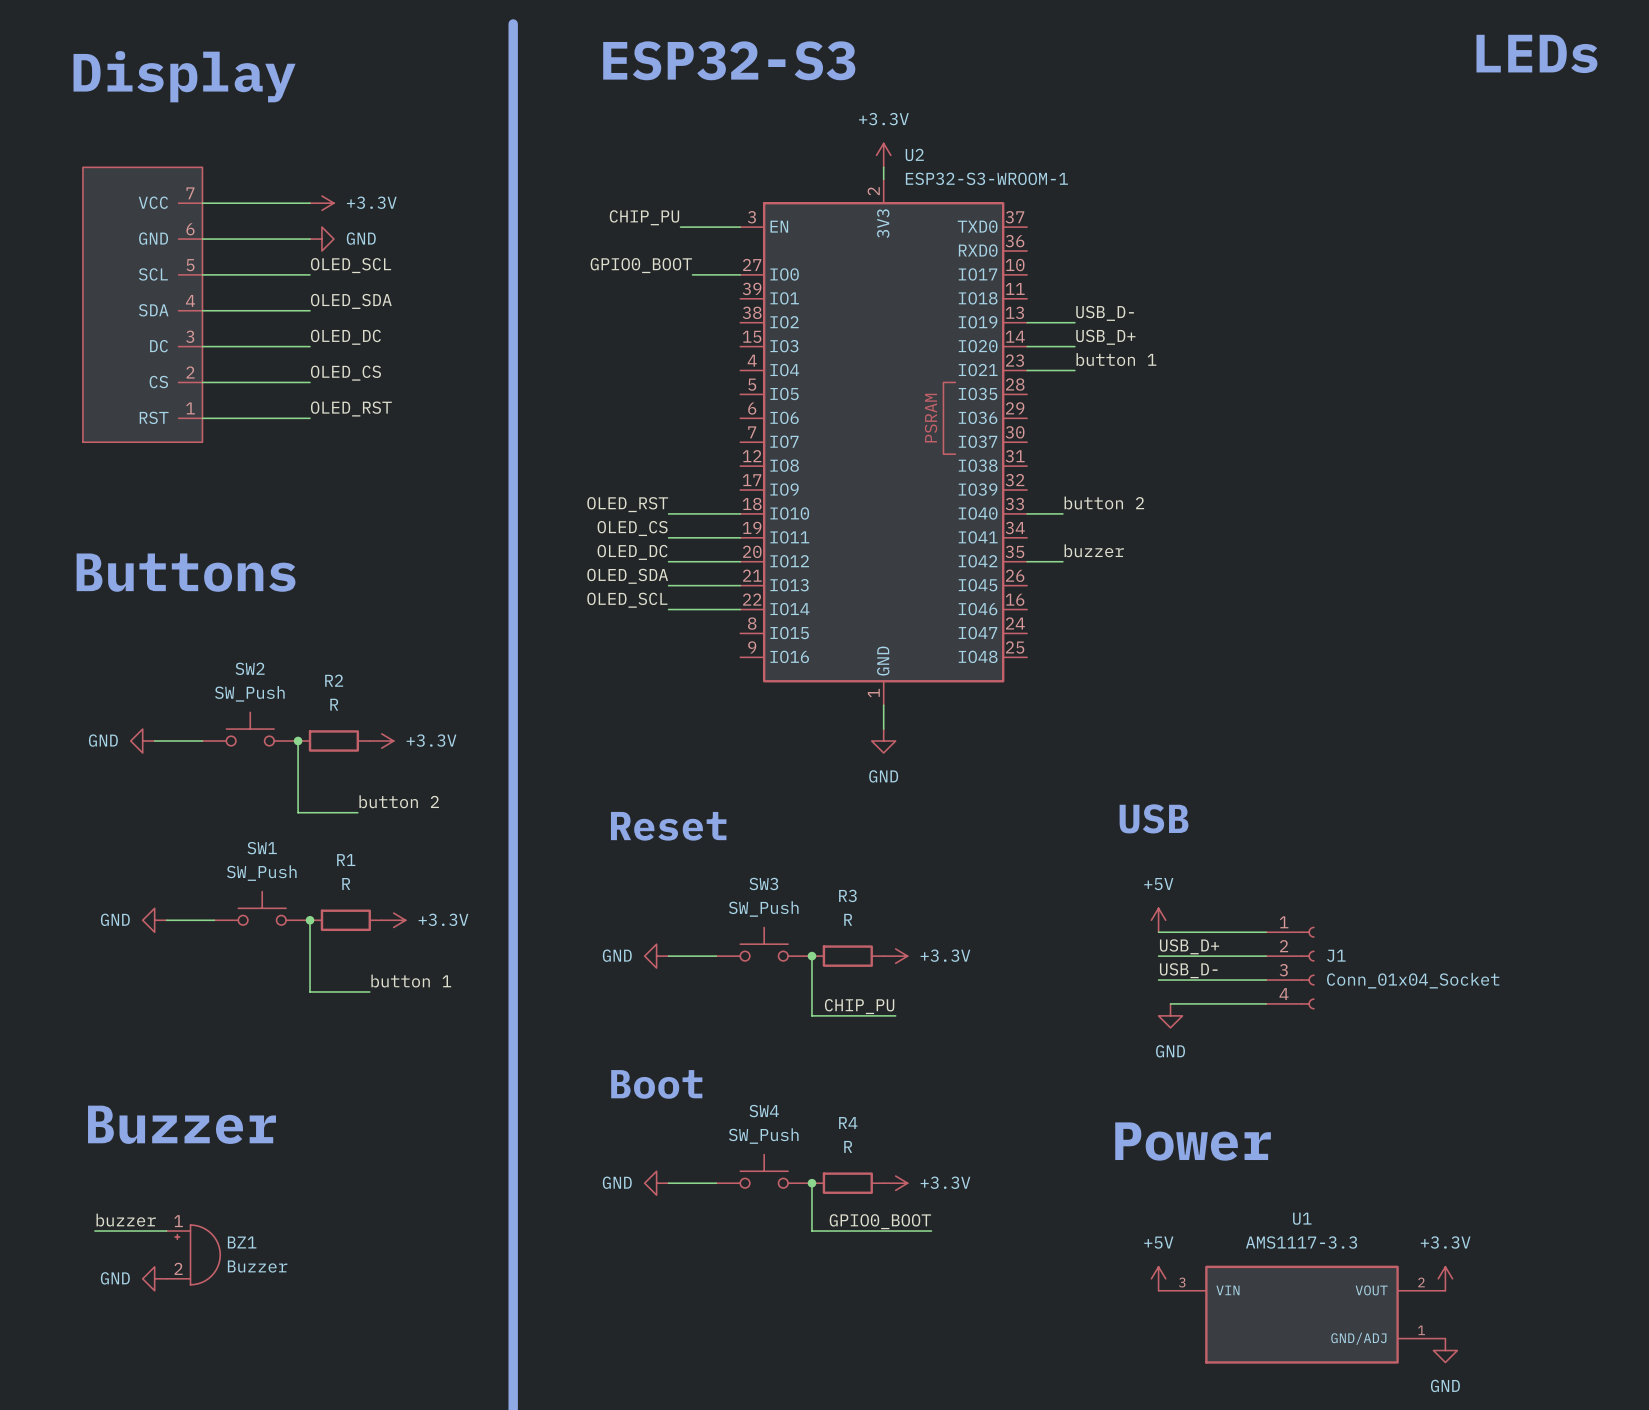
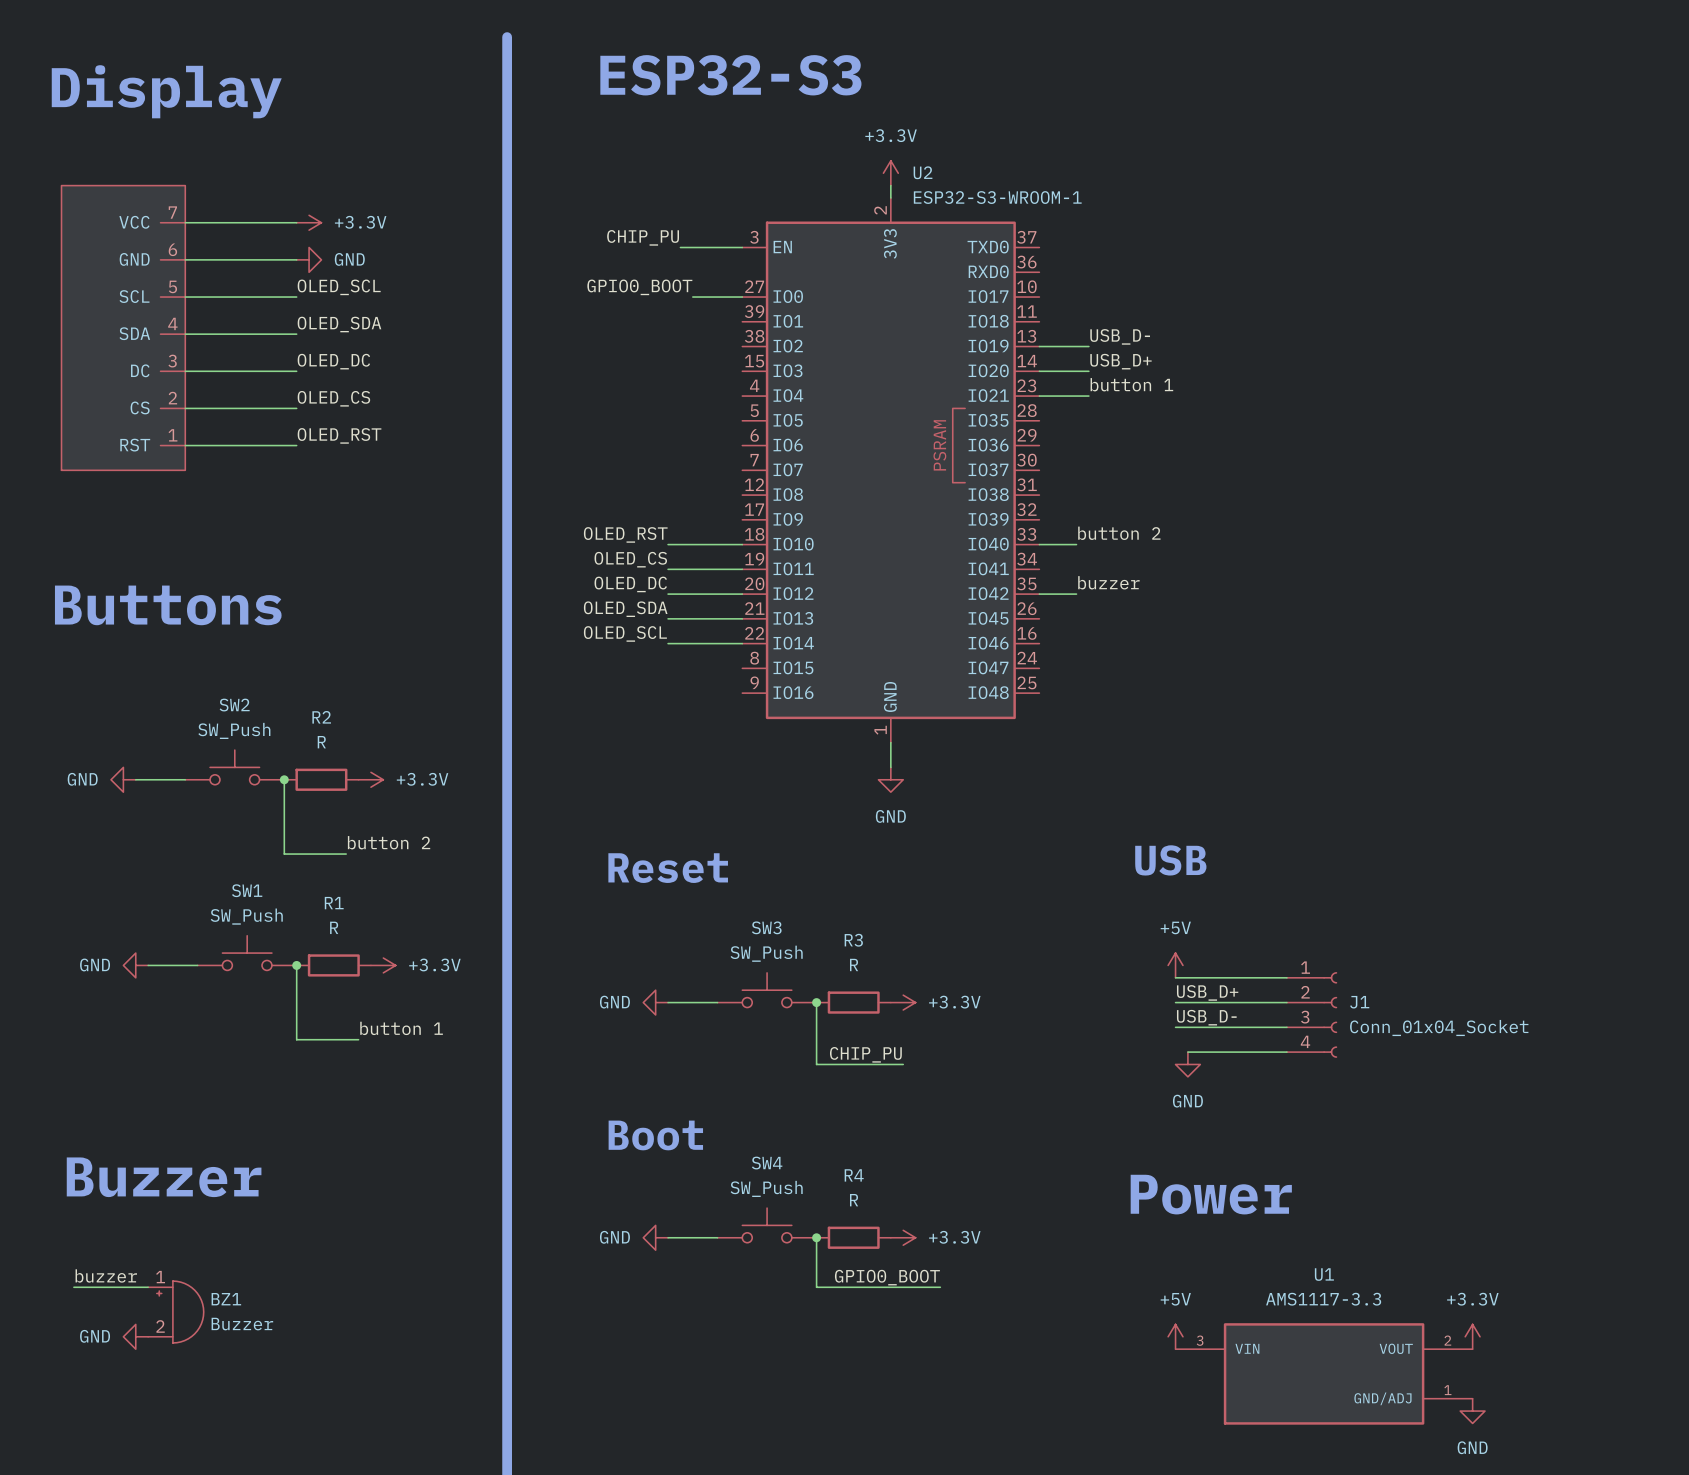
text: LEDs (1536, 53) -> none

